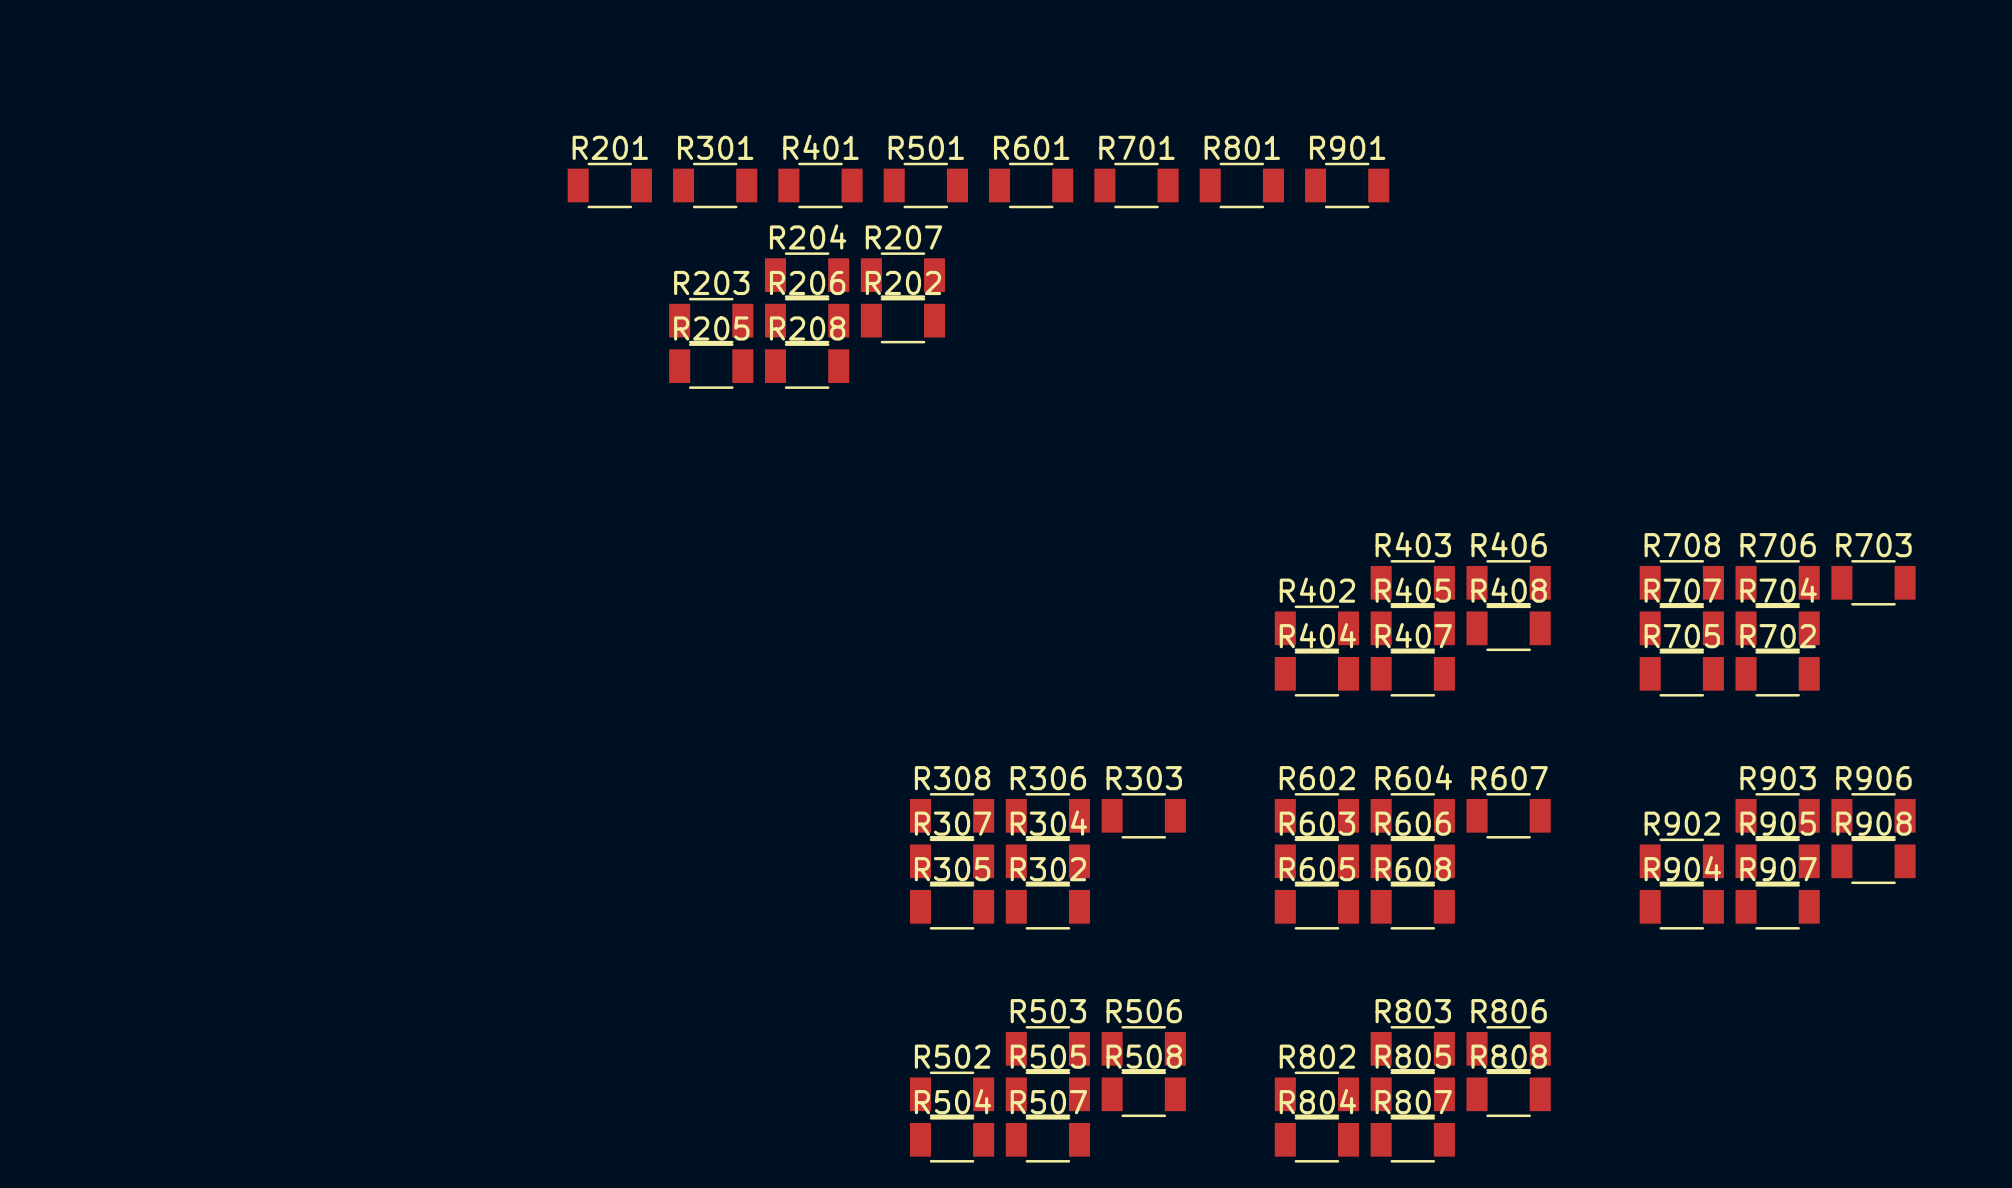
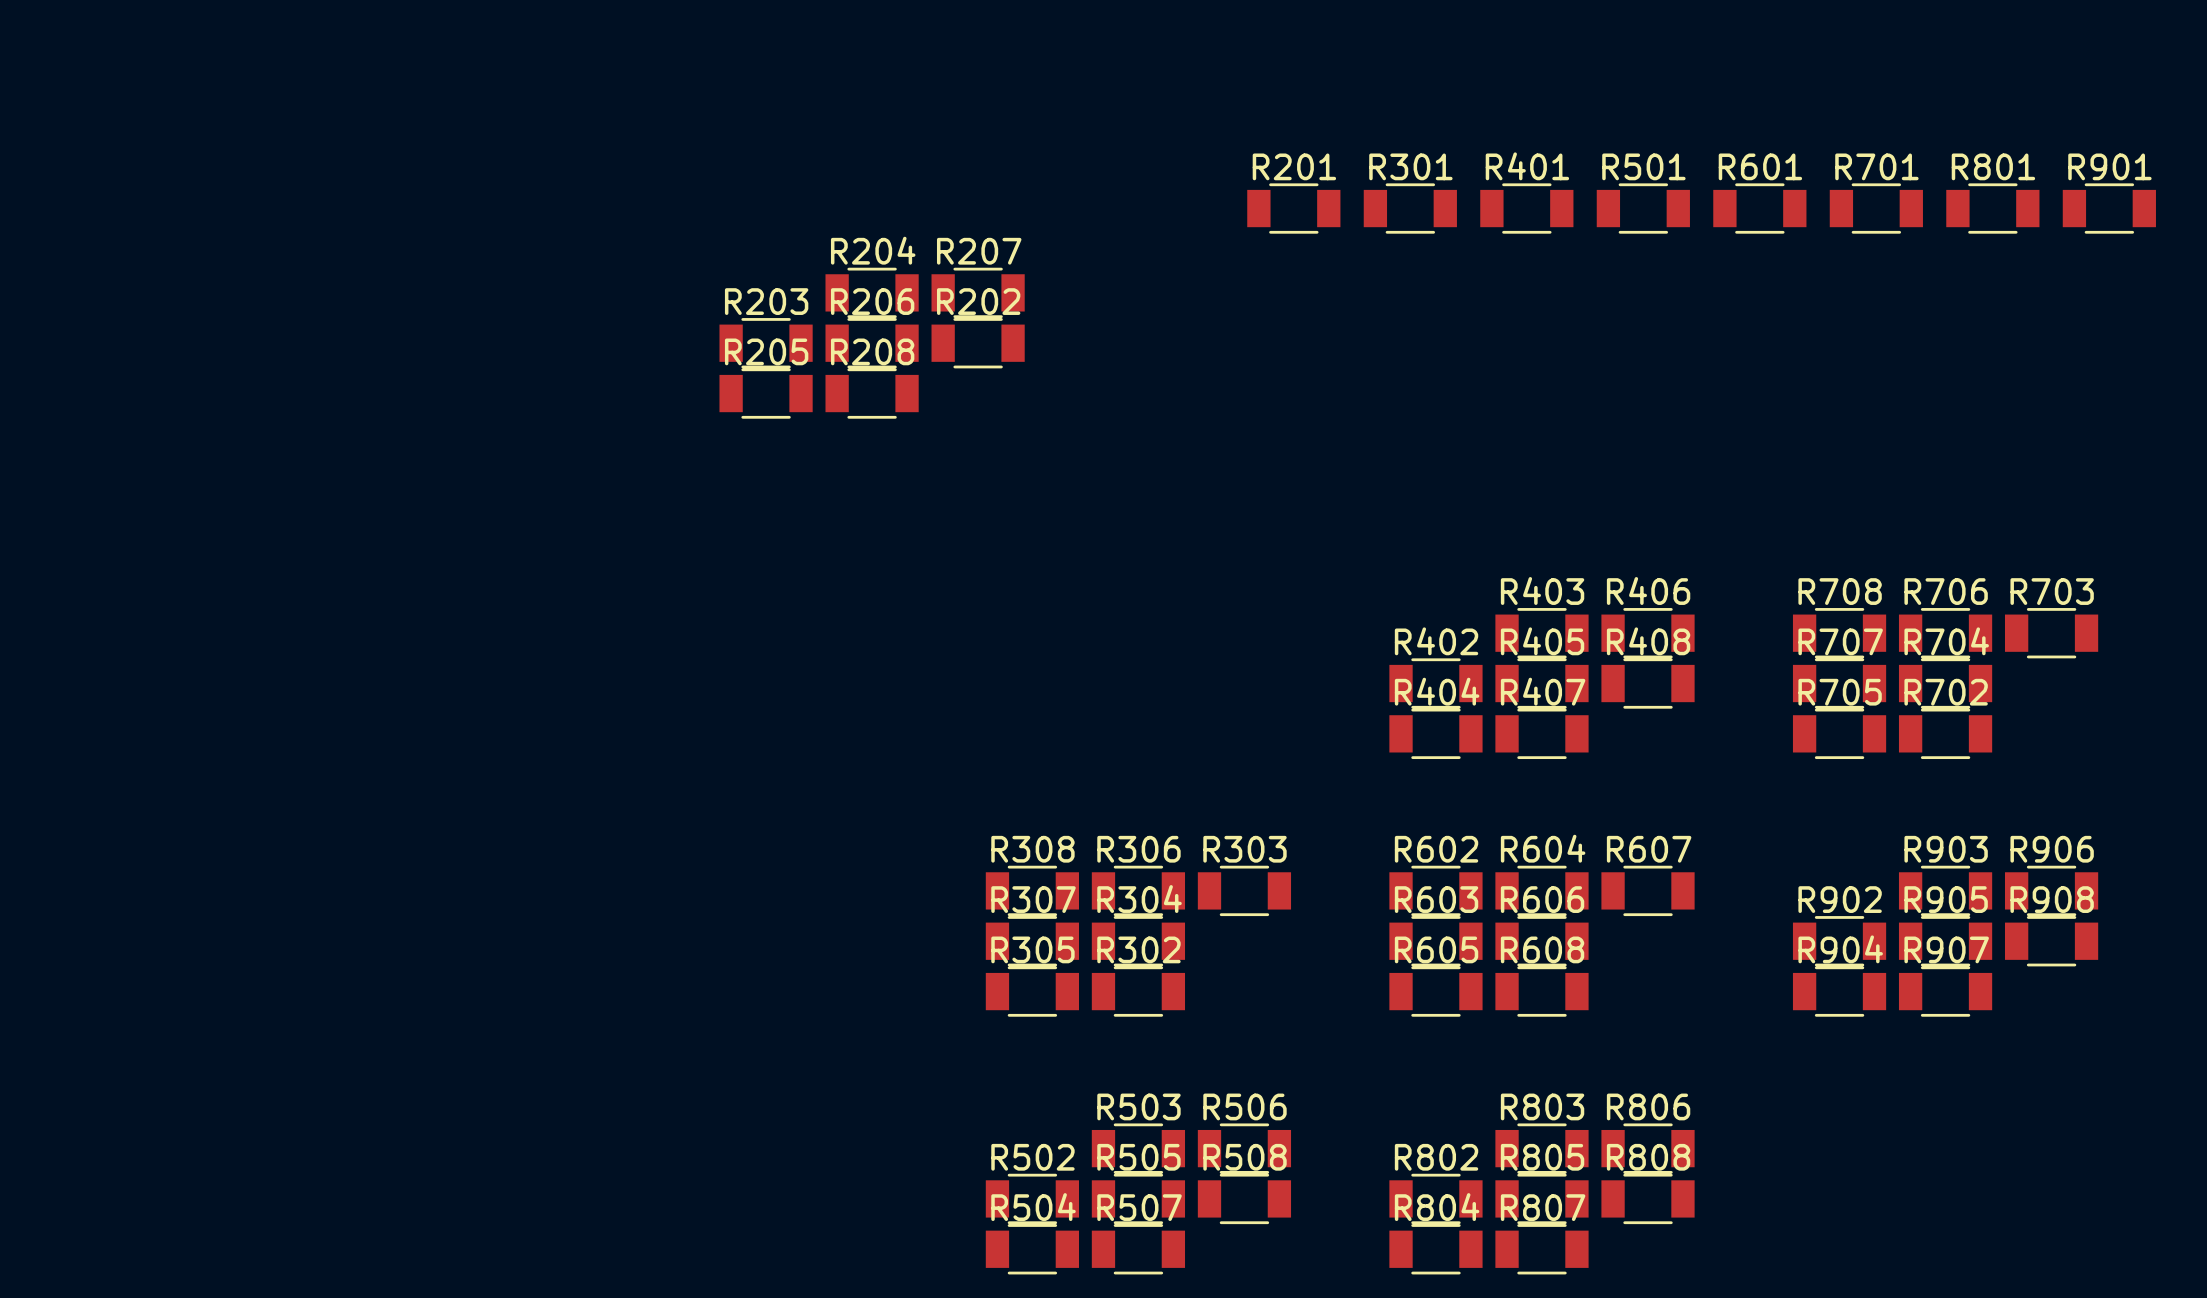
R201 position: (609, 185) -> (1293, 208)
R301 position: (715, 185) -> (1410, 208)
R401 position: (820, 185) -> (1526, 208)
R501 position: (925, 185) -> (1643, 208)
R601 position: (1031, 185) -> (1759, 208)
R701 position: (1136, 185) -> (1876, 208)
R801 position: (1241, 185) -> (1992, 208)
R901 position: (1347, 185) -> (2109, 208)

